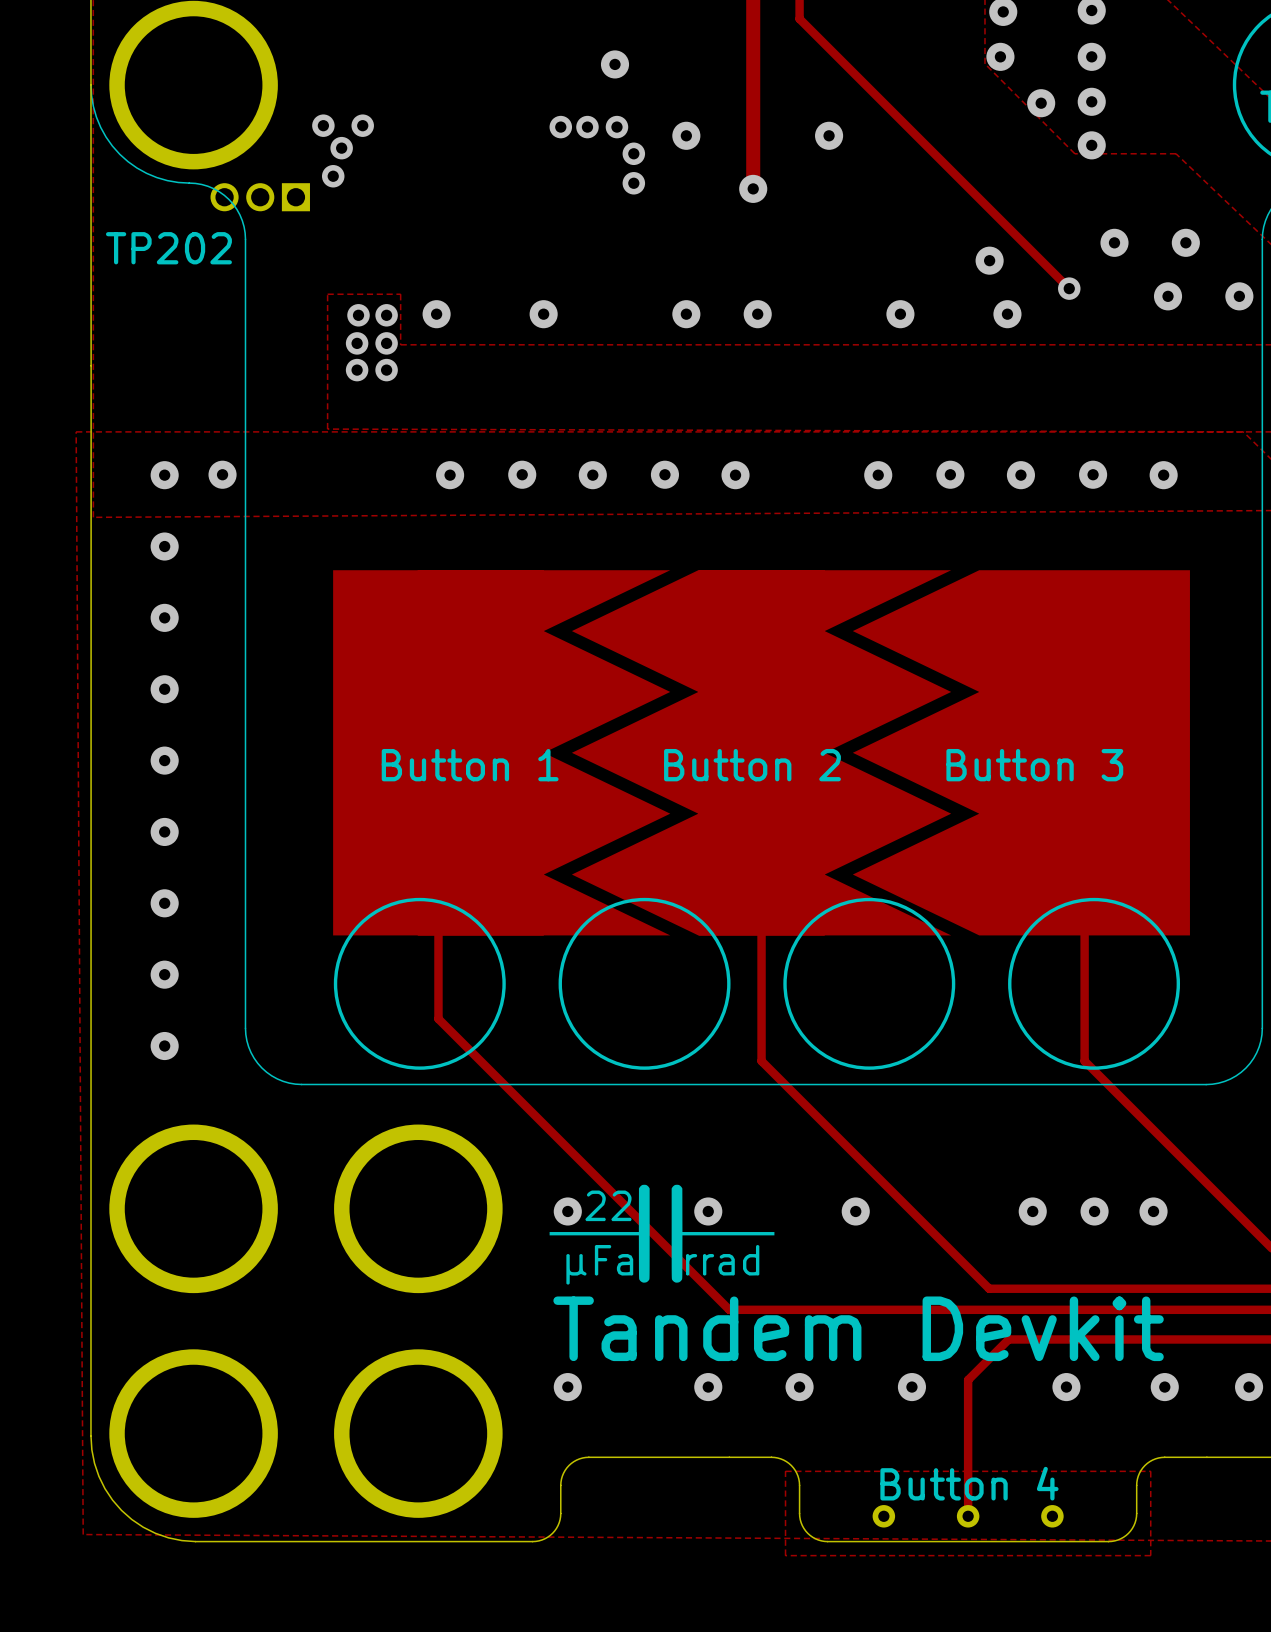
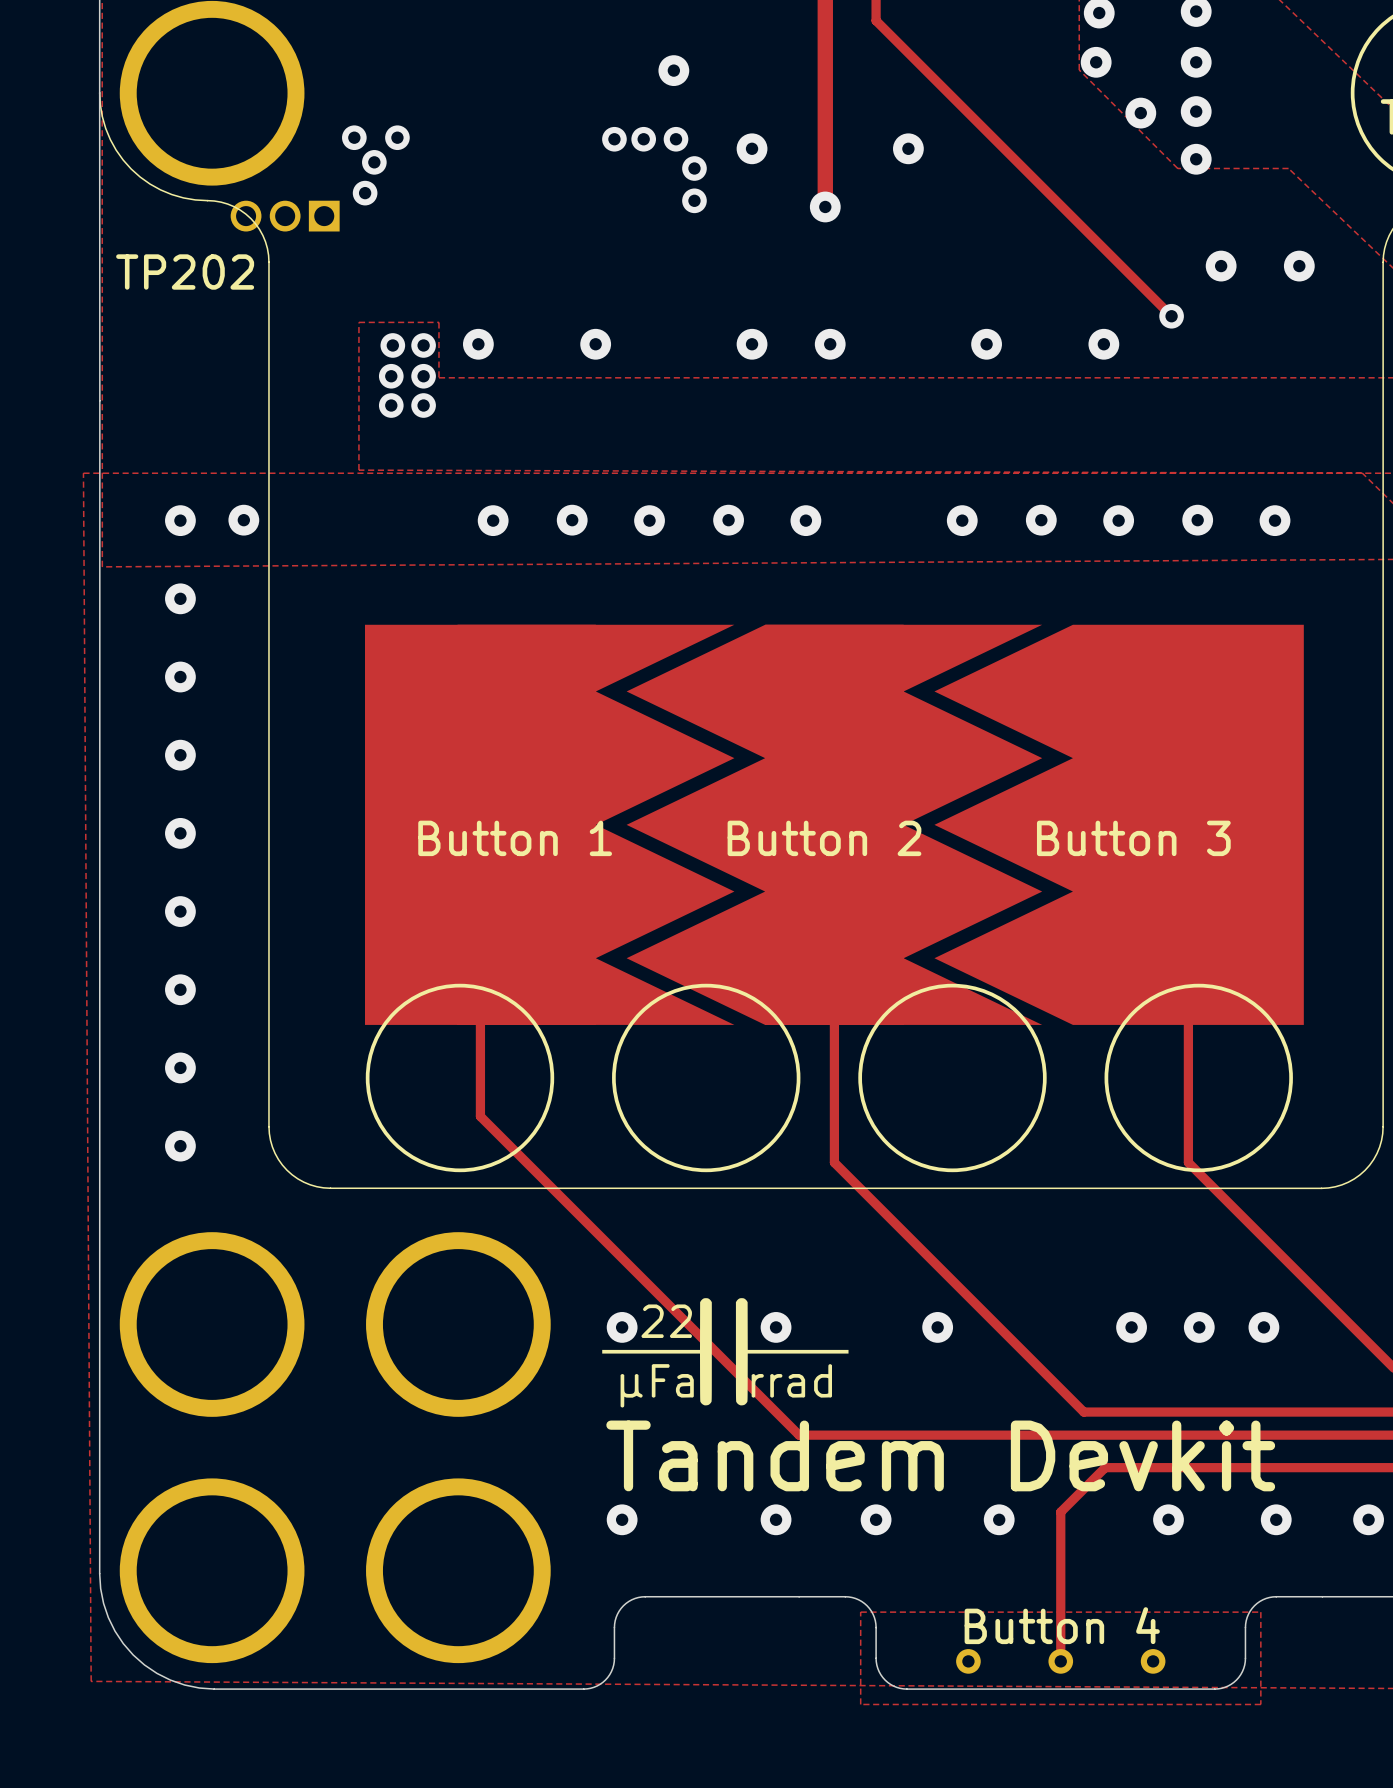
via: (989, 260) -> none
via: (1168, 296) -> none
via: (1239, 296) -> none

